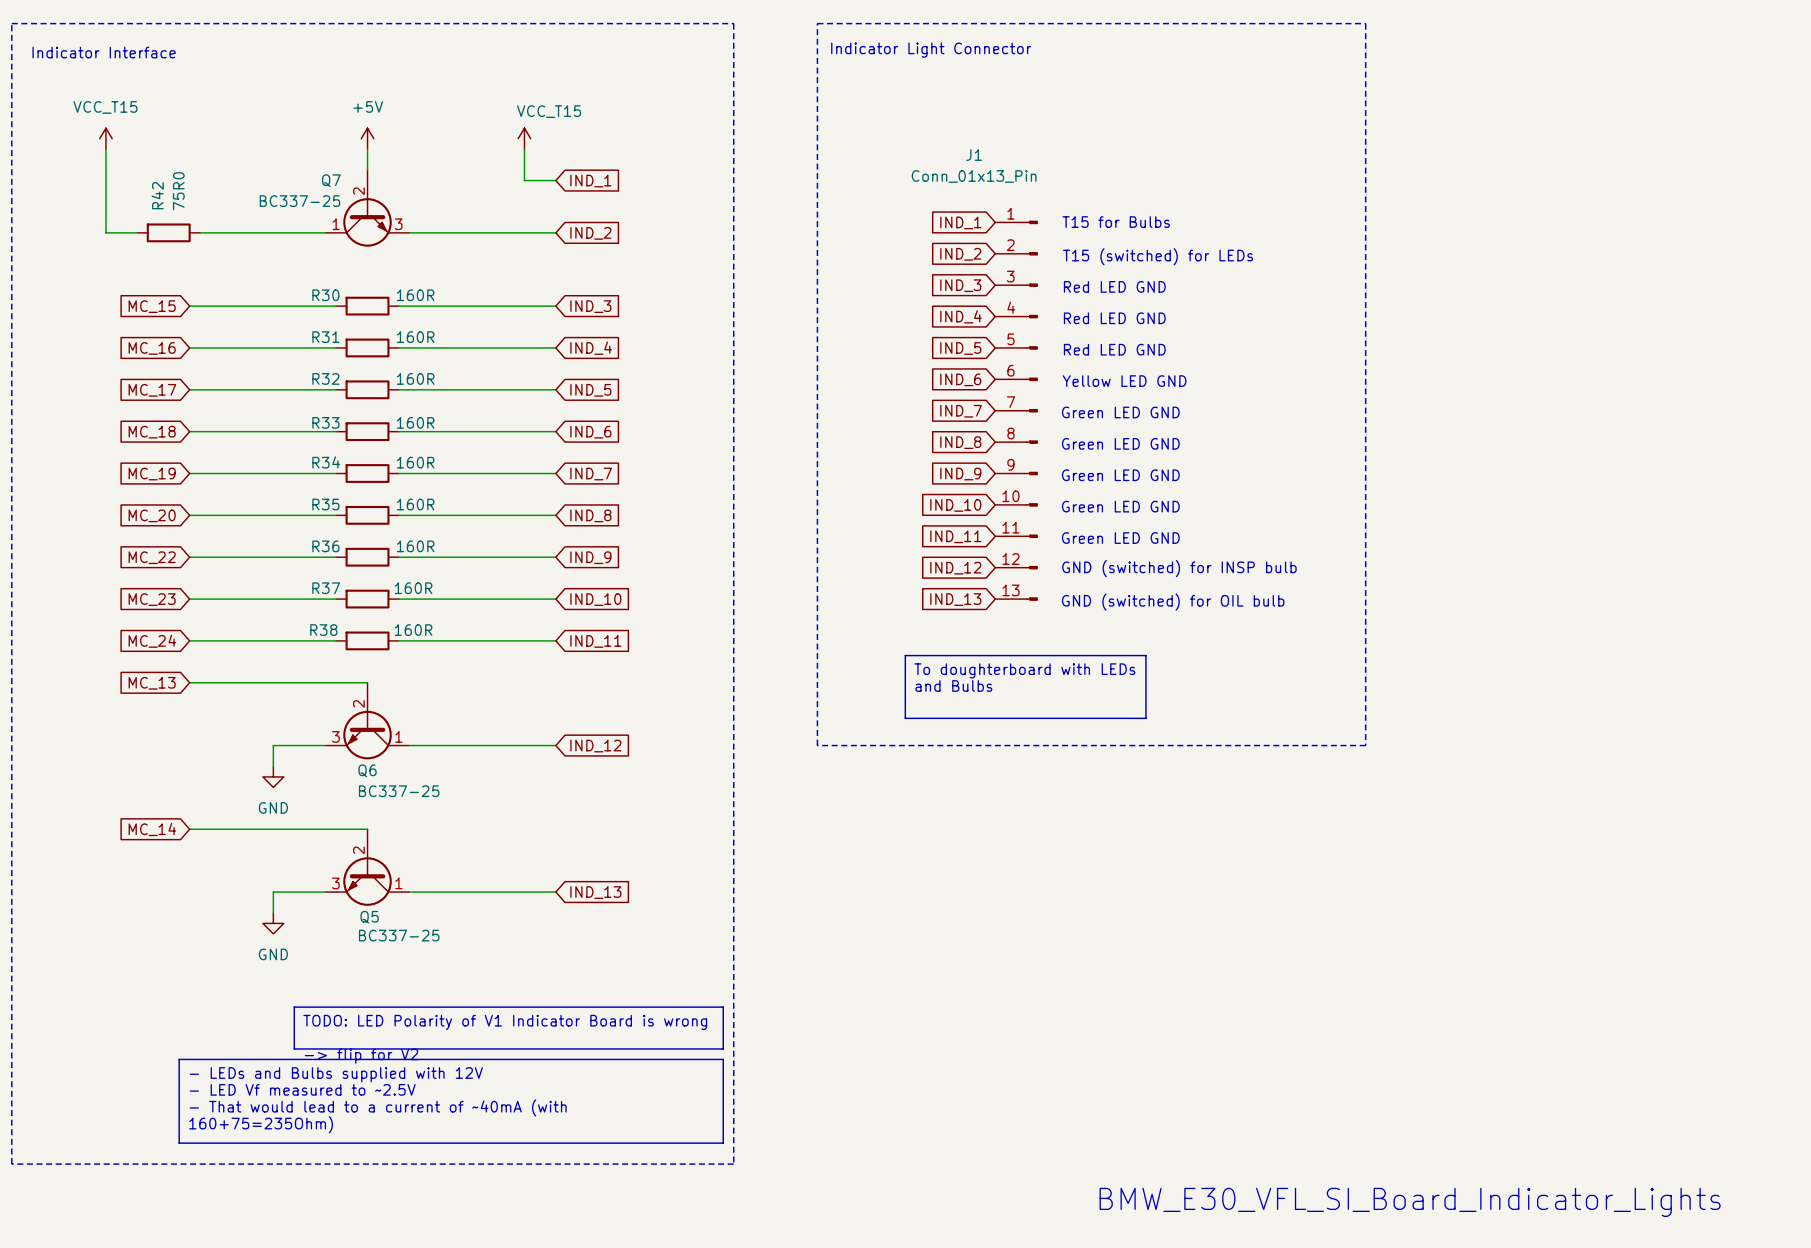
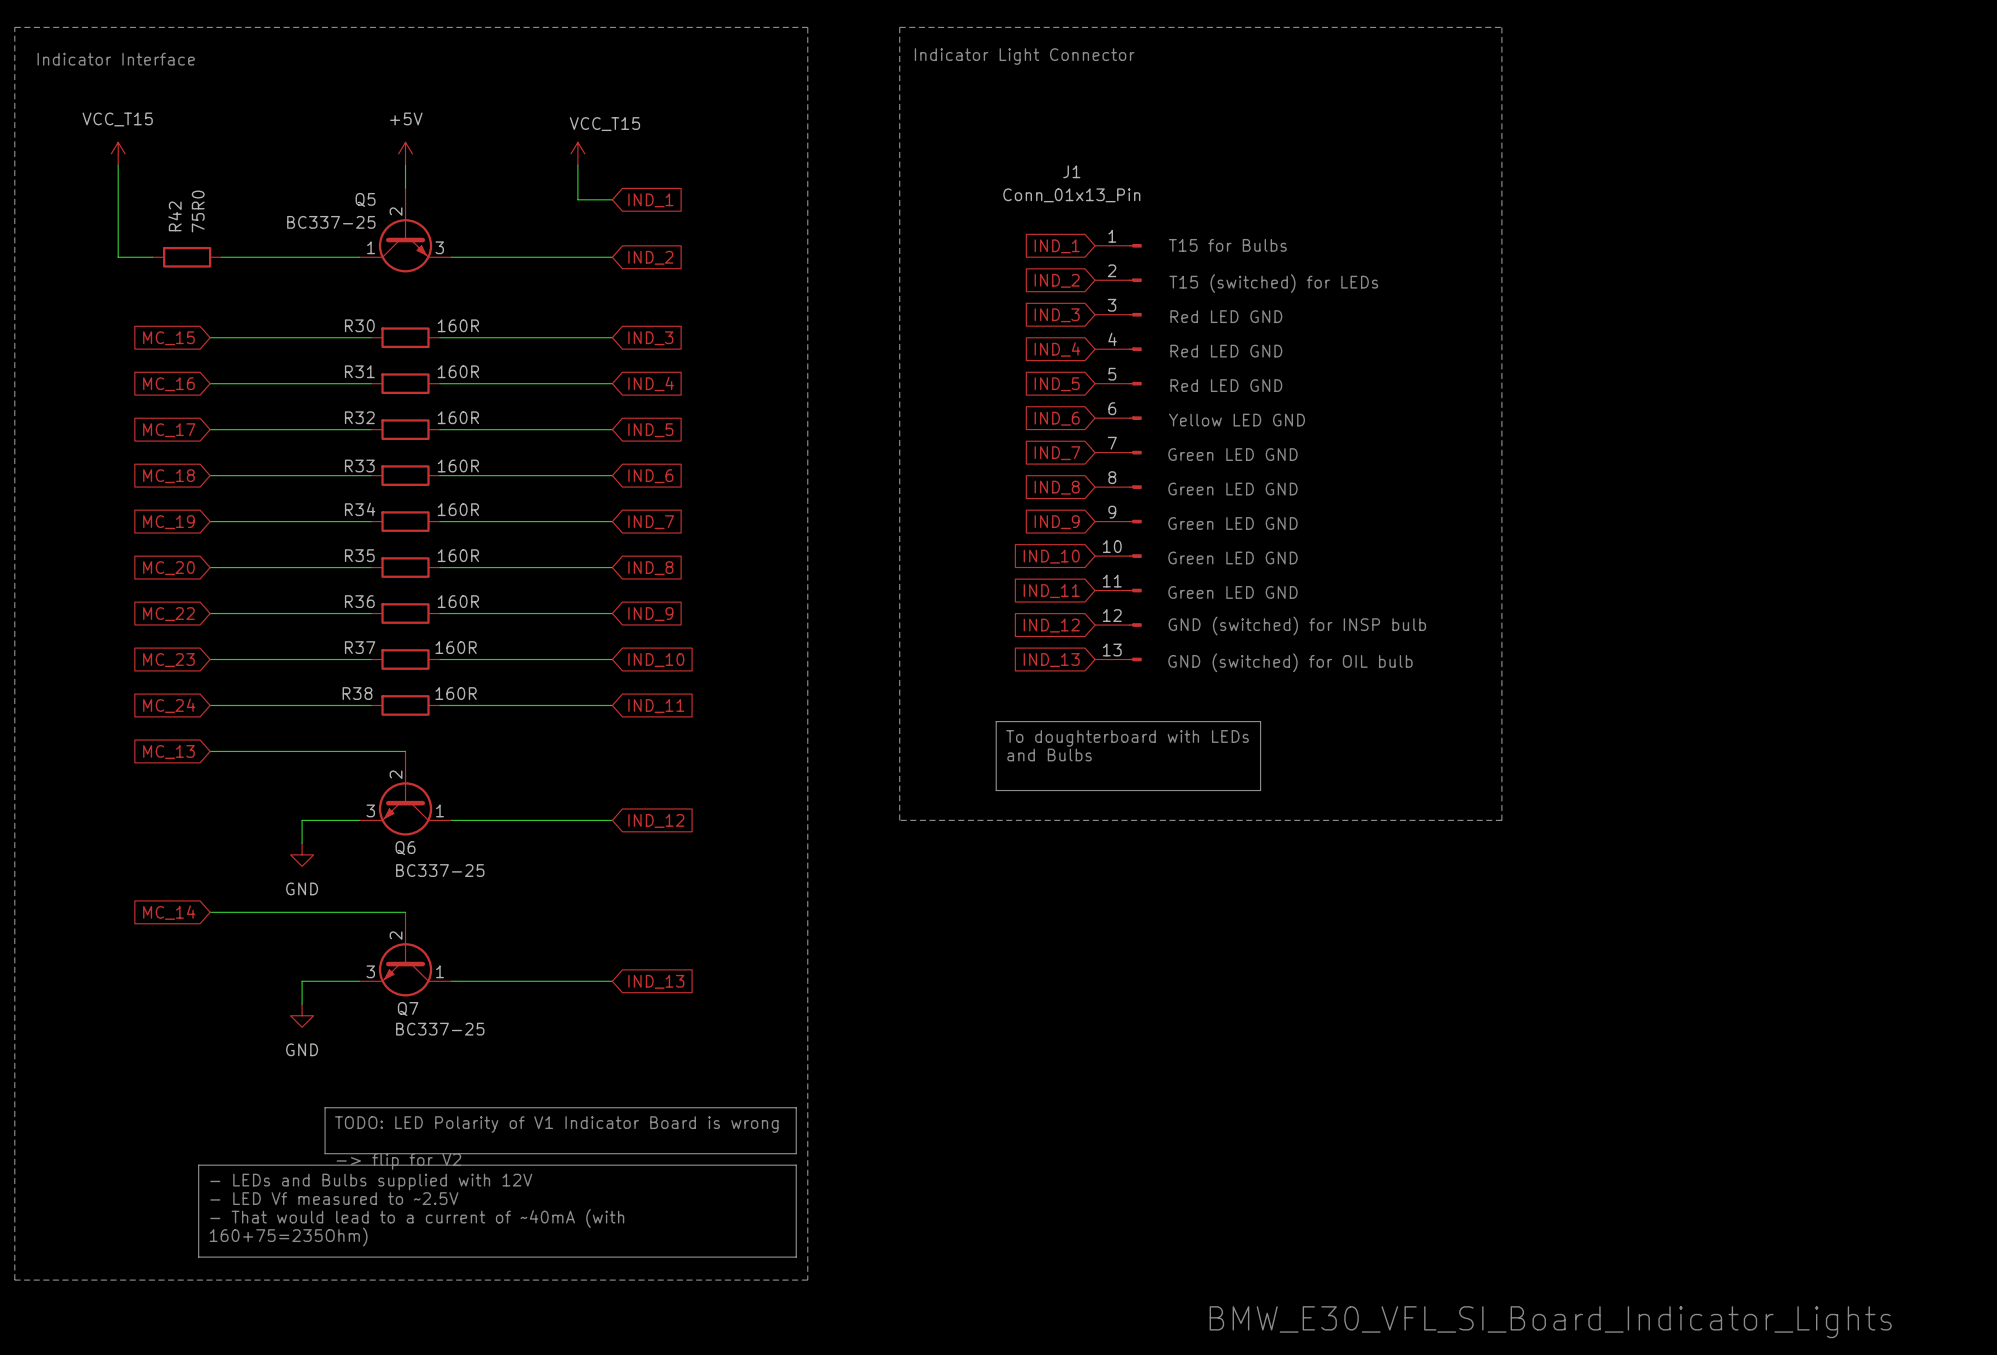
Q7 name: Q7 (331, 180) -> Q5 (365, 199)
Q5 name: Q5 (369, 917) -> Q7 (408, 1008)

